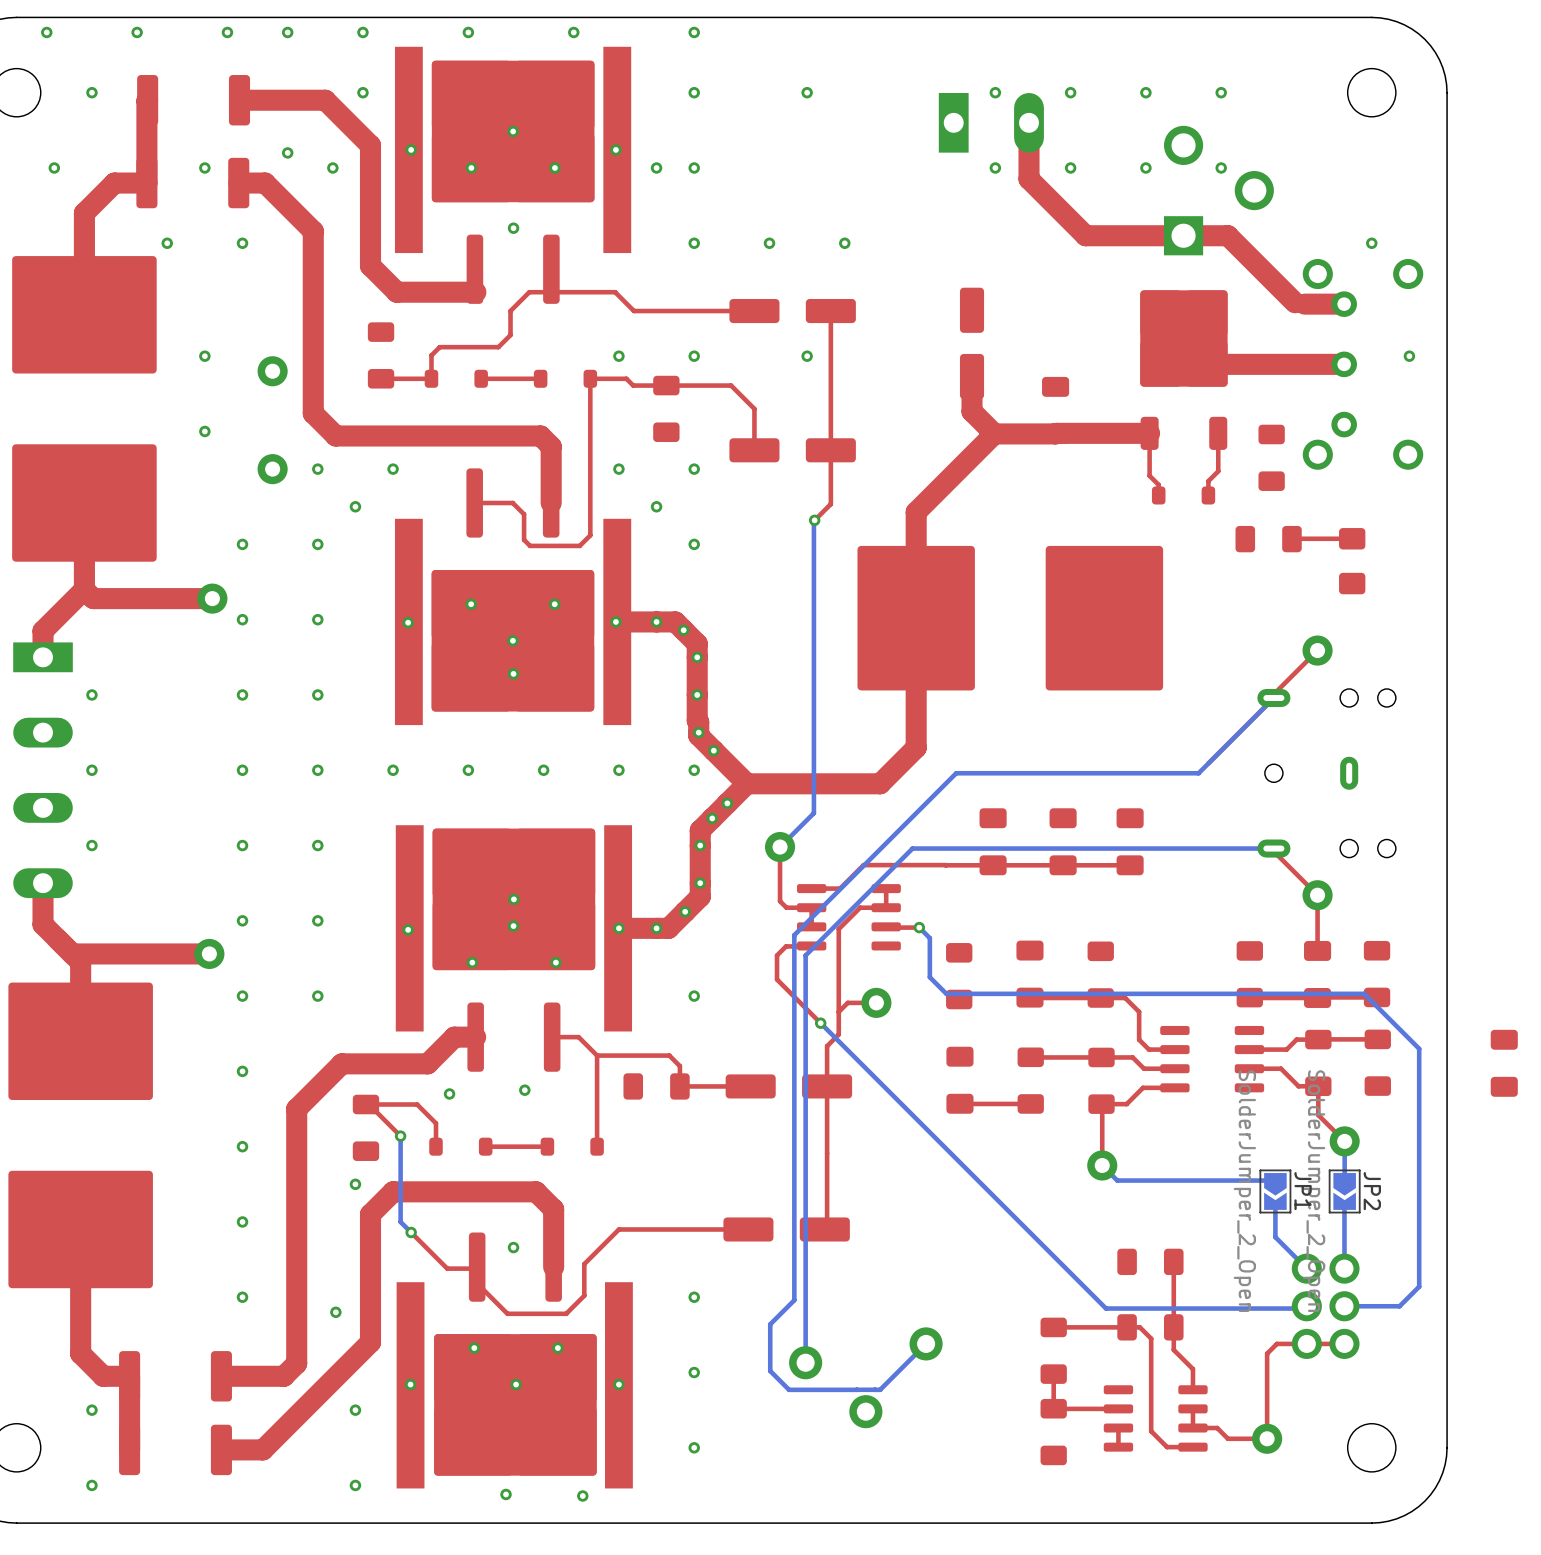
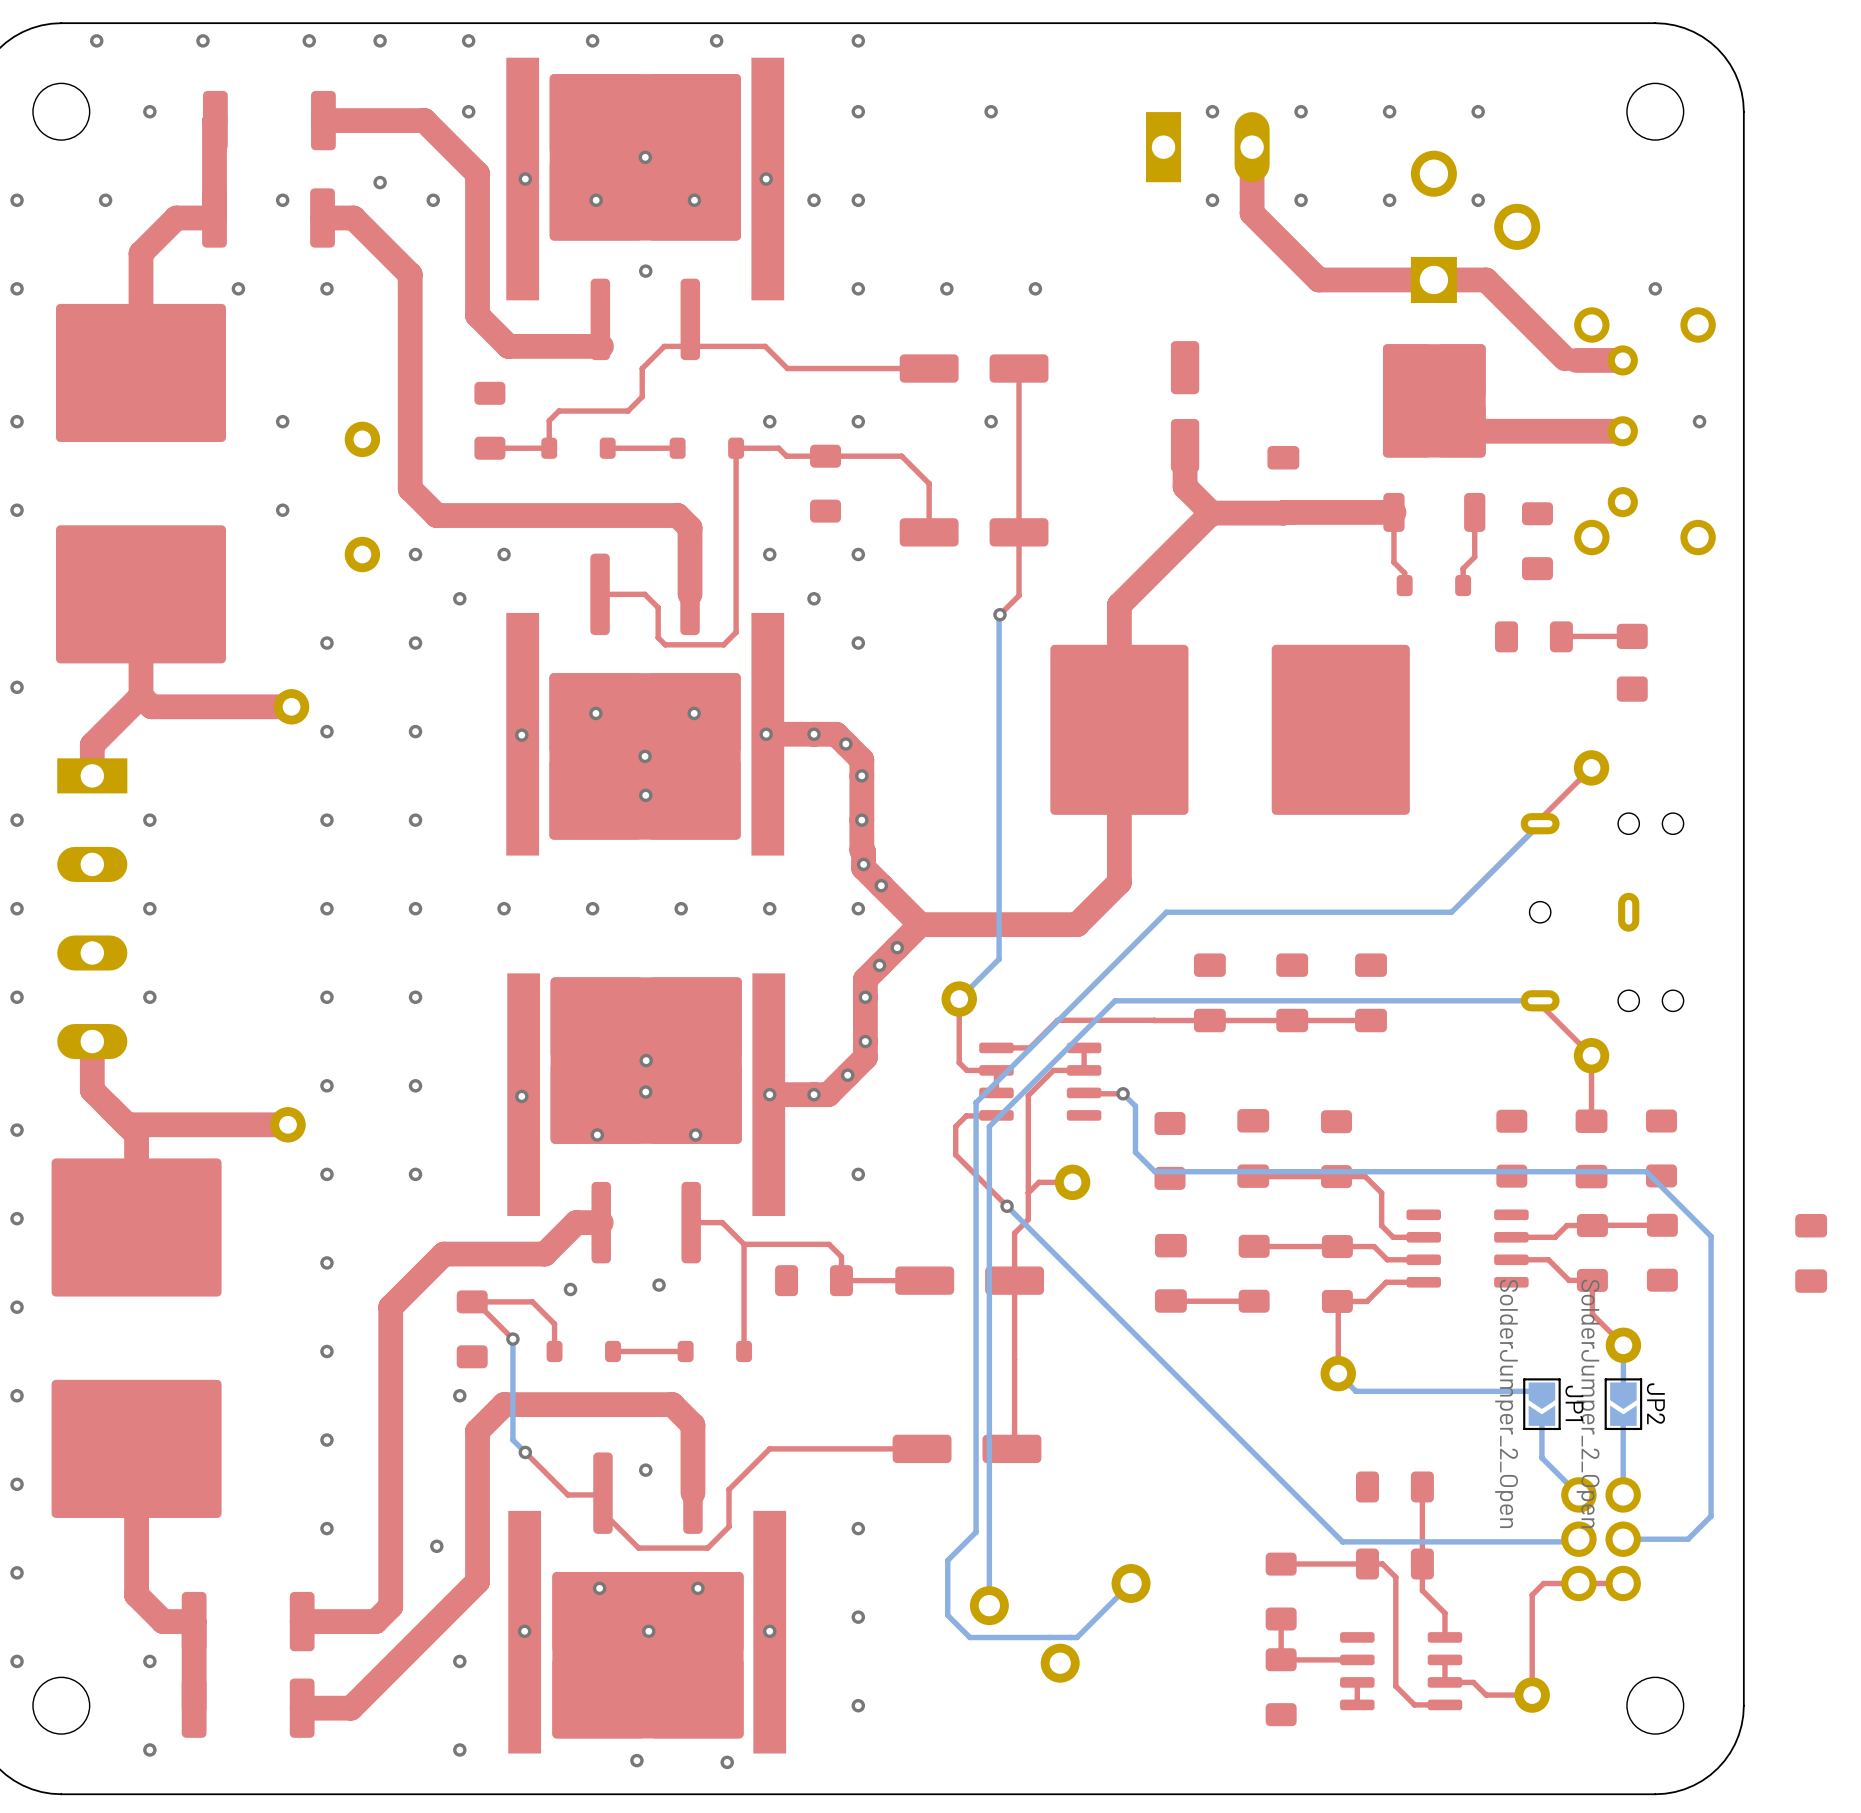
top track: (1377, 997) (1249, 997) -> none

